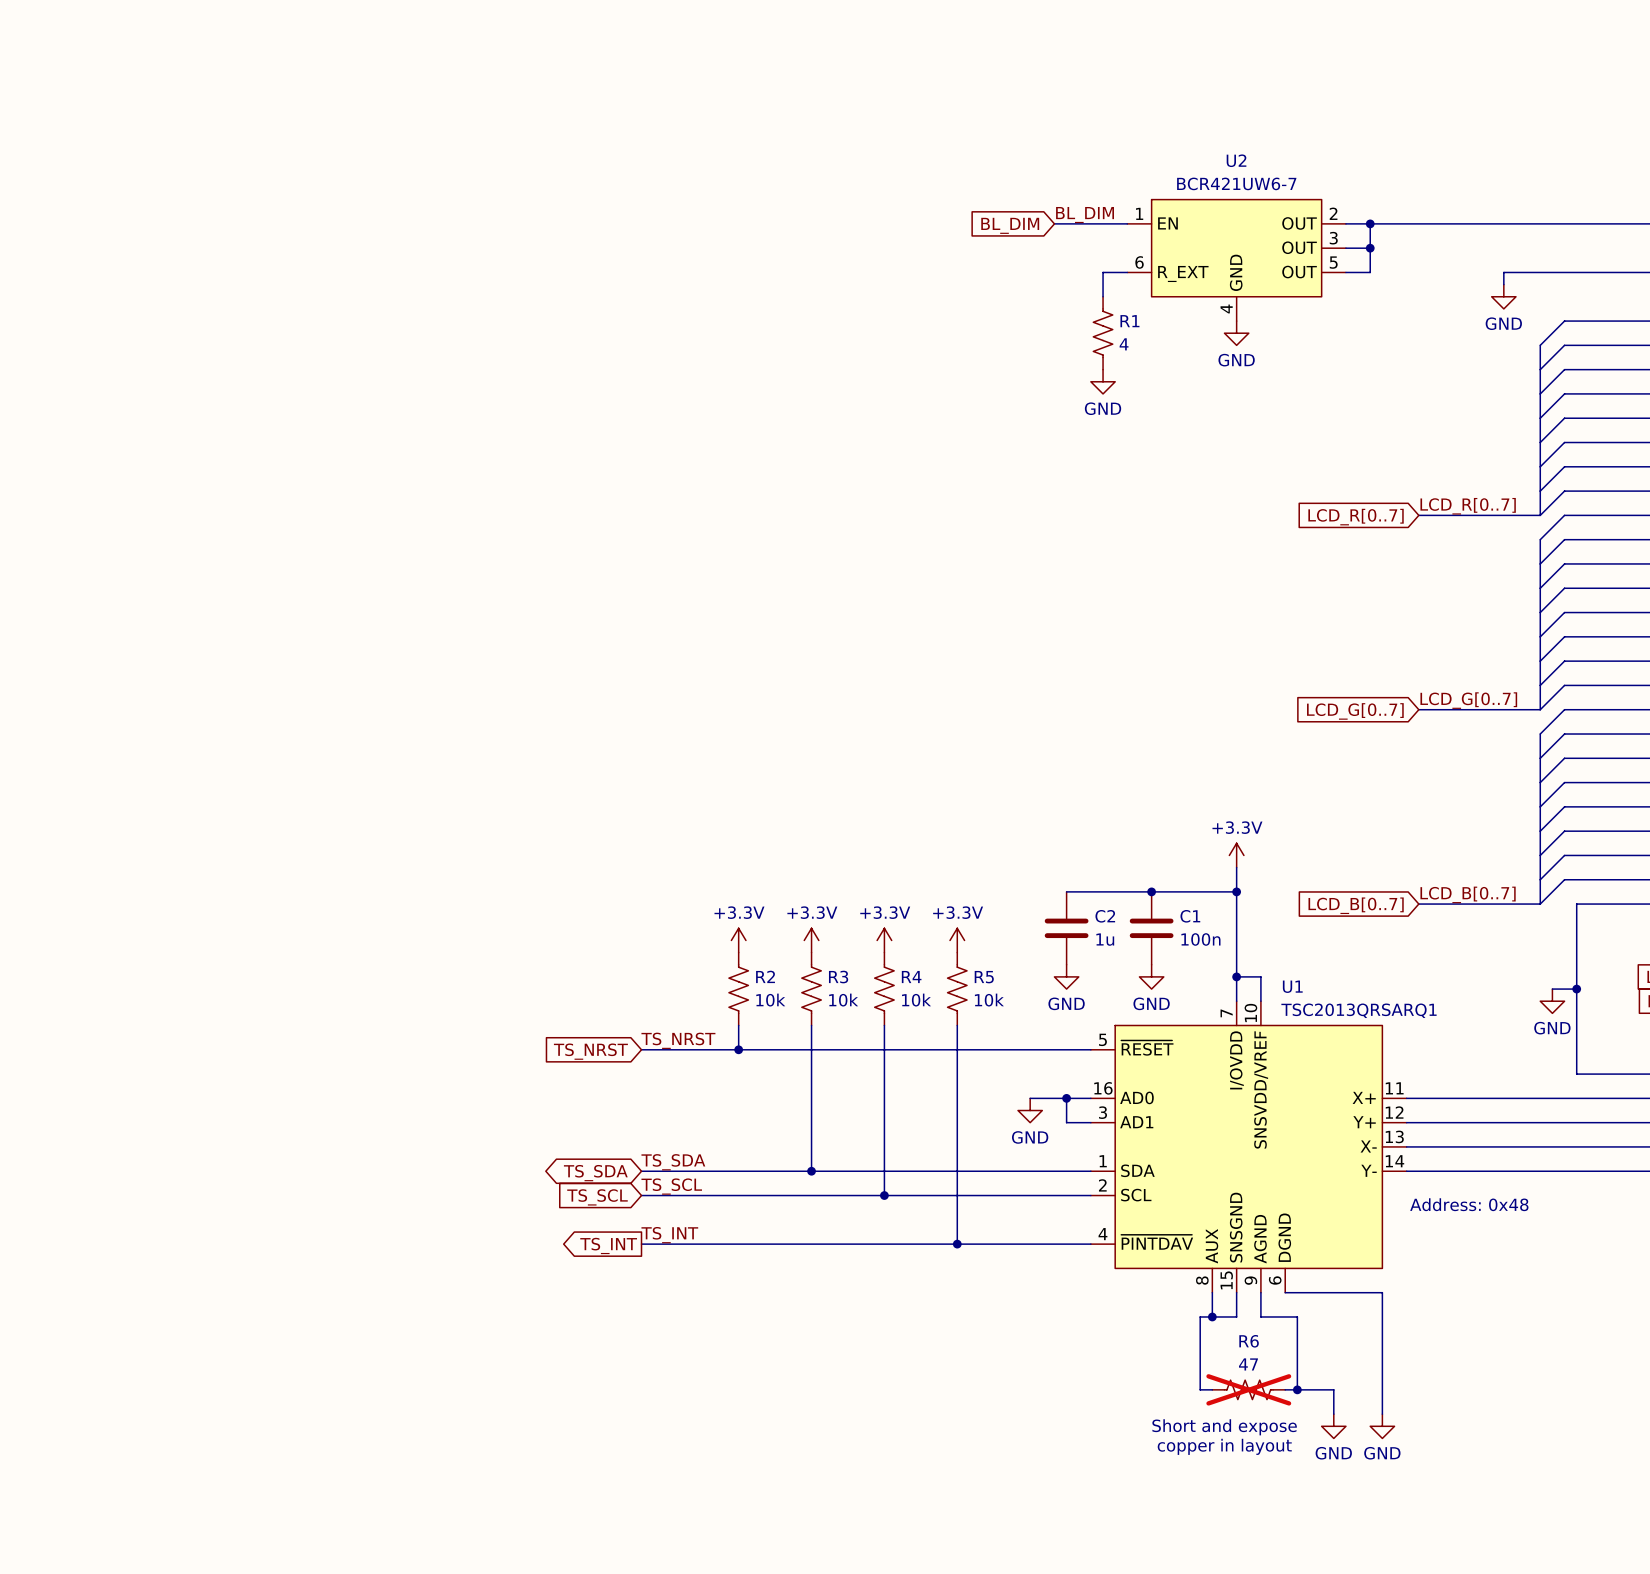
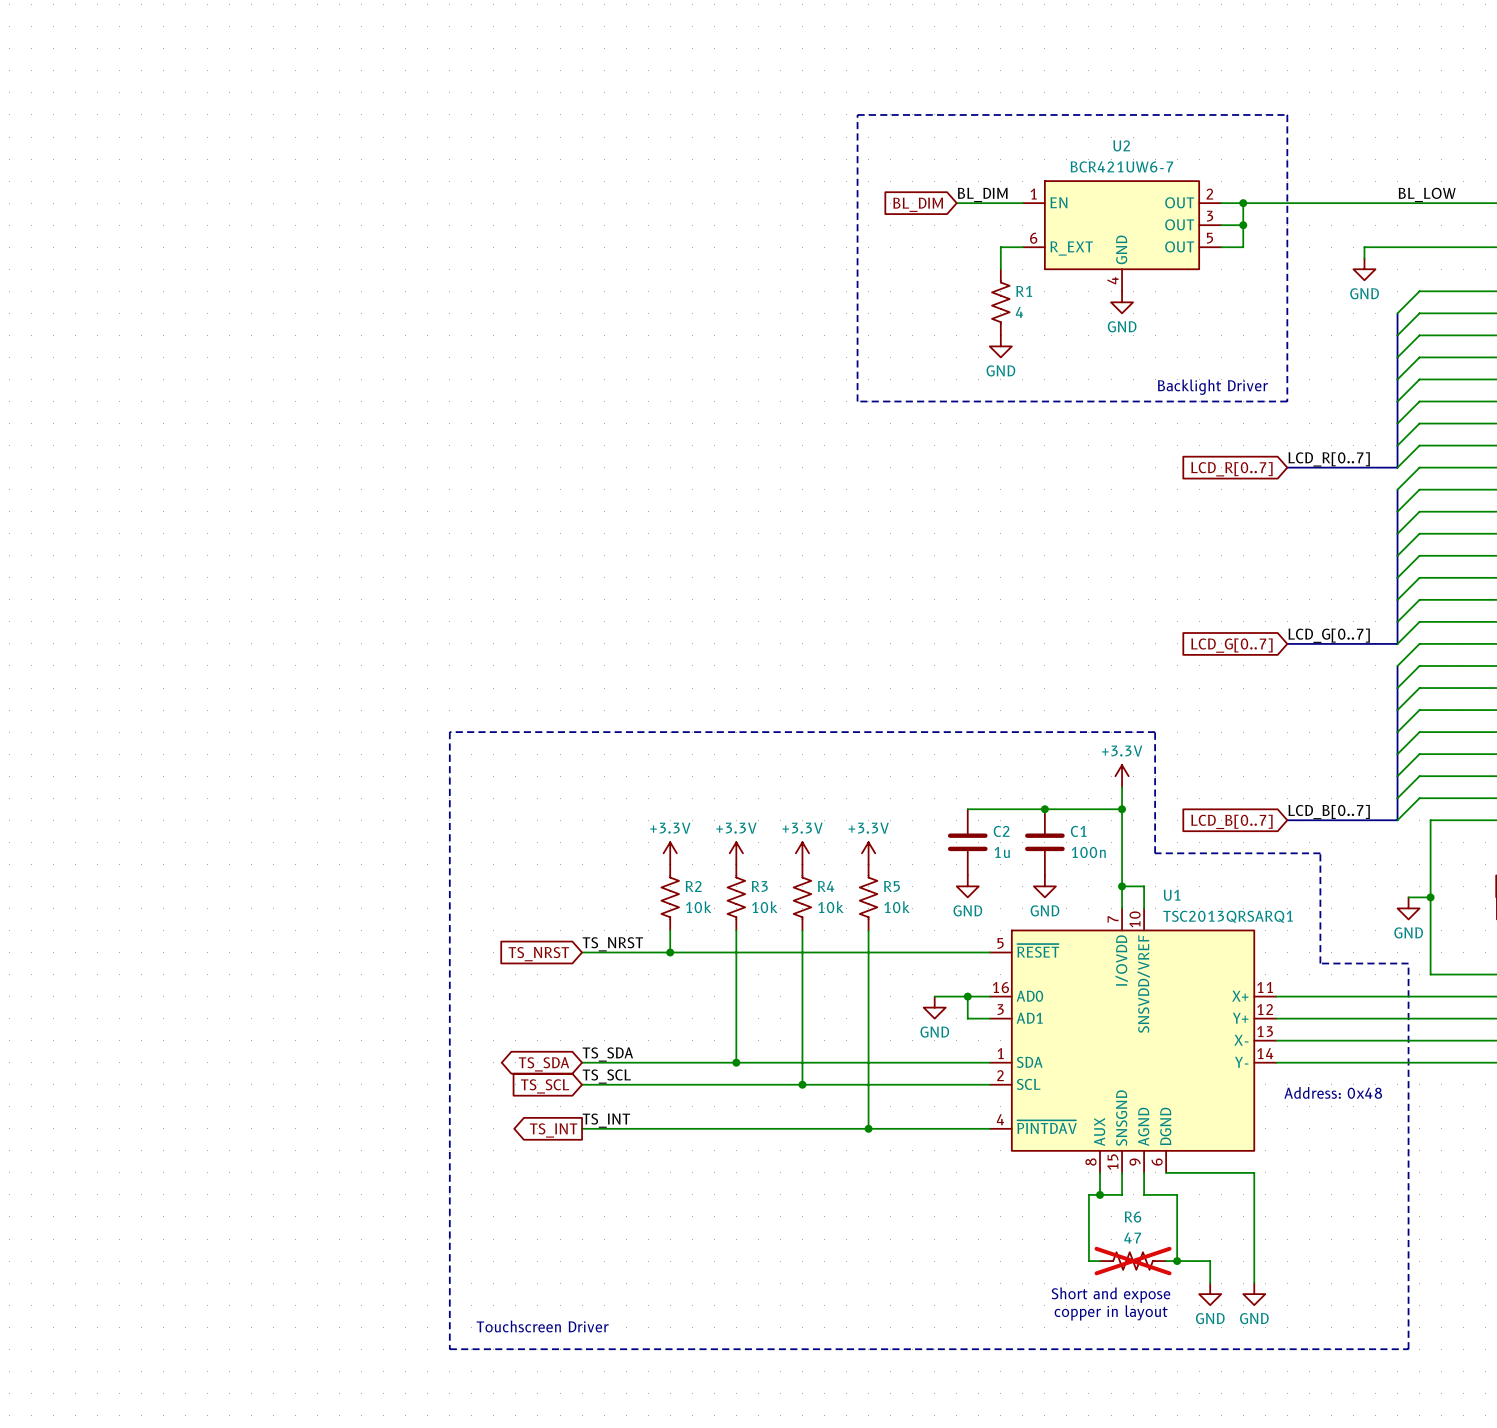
line: none -> (857, 114) (1287, 114) (1287, 401) (857, 401) (857, 114)
label: none -> BL_LOW (1427, 194)
text: none -> Backlight Driver (1212, 387)
line: none -> (449, 732) (449, 1349) (1408, 1349) (1408, 963) (1320, 963) (1320, 853) (1155, 853) (1155, 732) (449, 732)
text: none -> Touchscreen Driver (542, 1326)

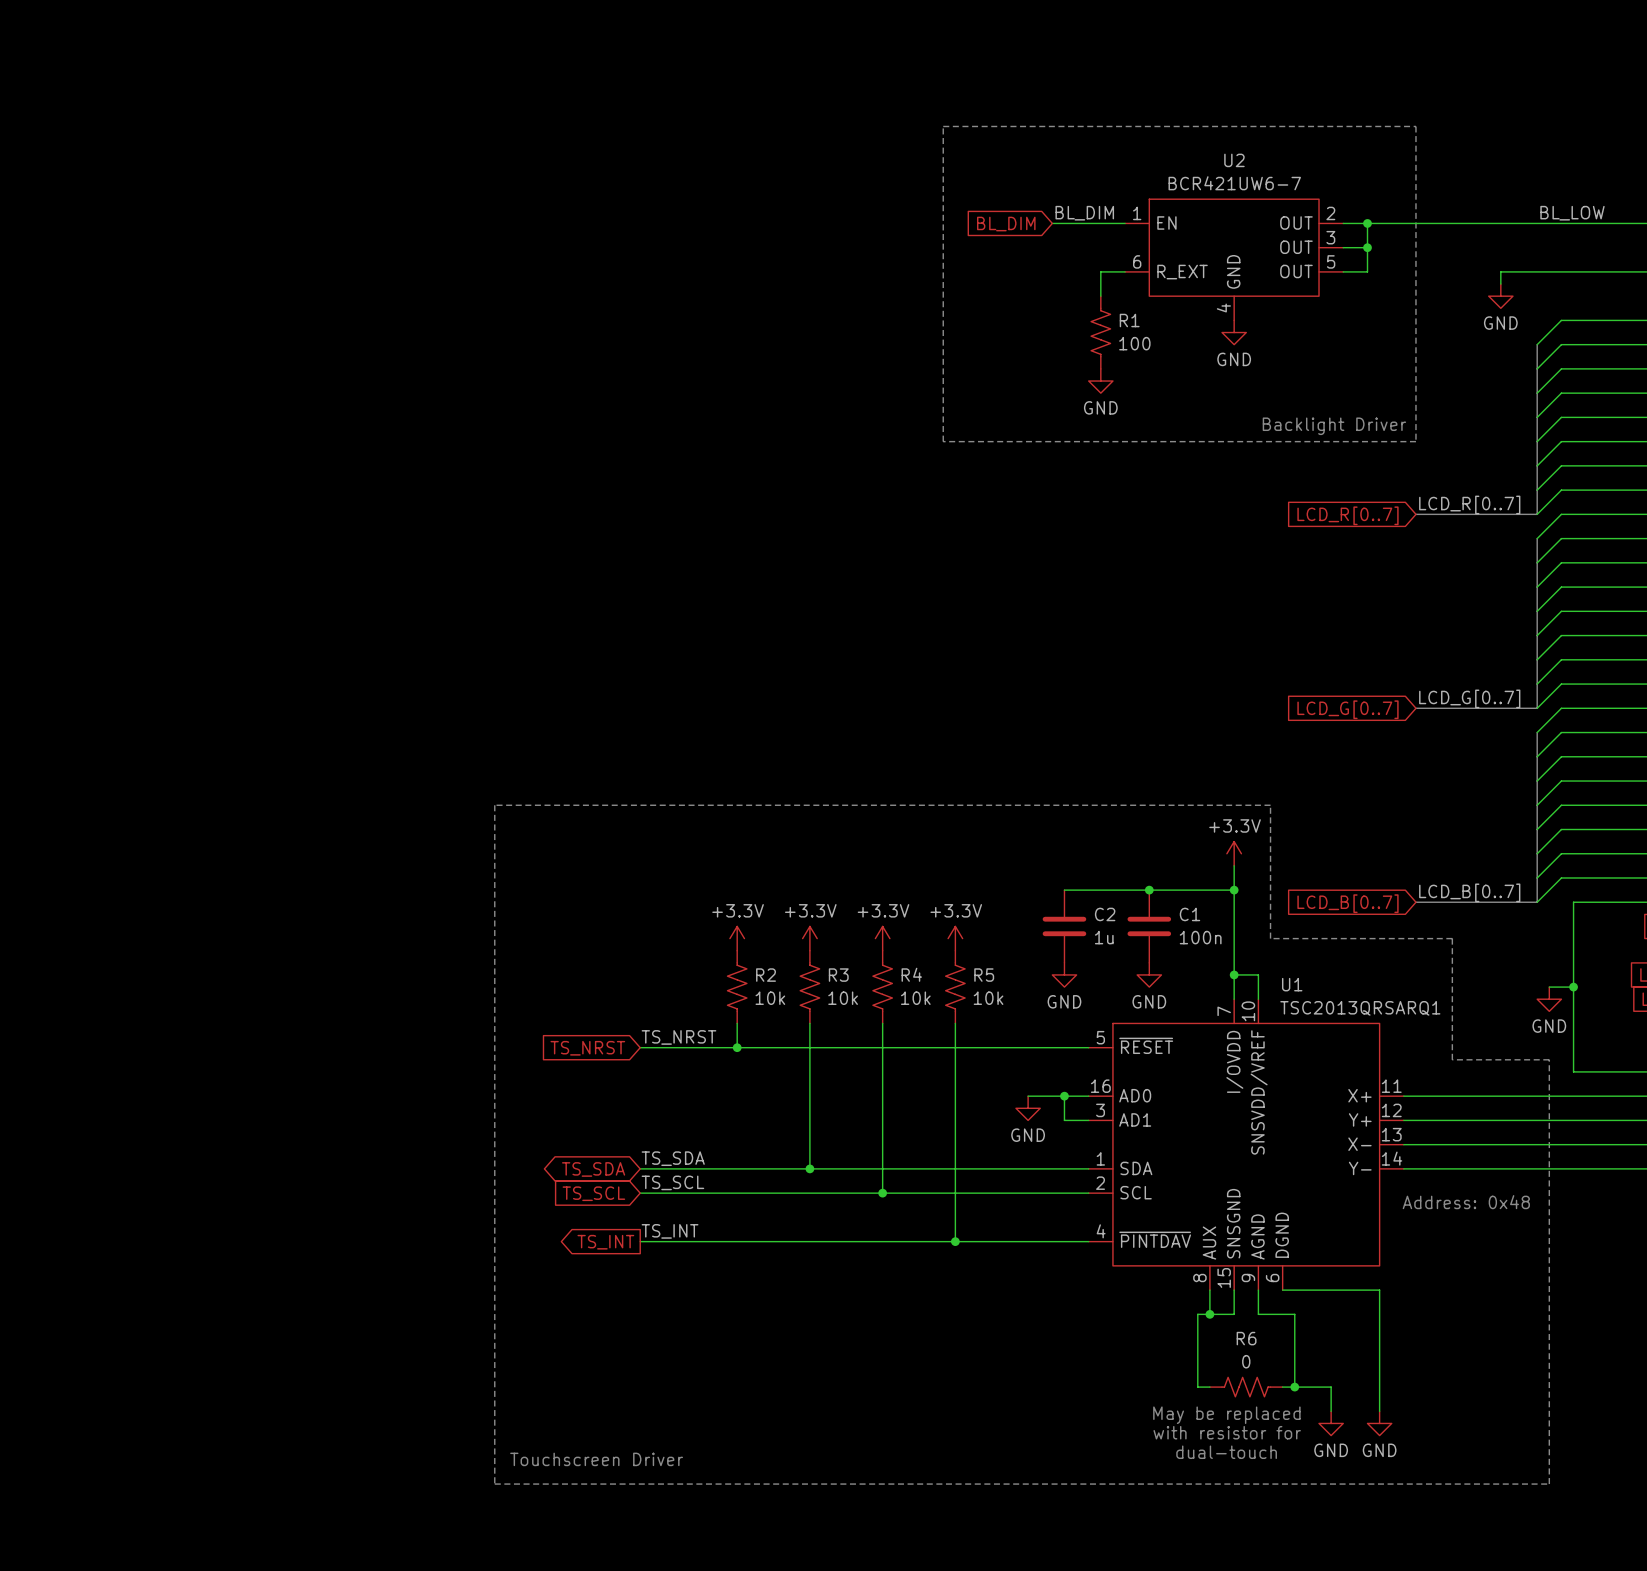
R1 value: 4 (1019, 312) -> 100 (1134, 343)
R6 value: 47 (1132, 1238) -> 0 (1246, 1361)
R6 do-not-place cross: (1133, 1261) -> none
text: none -> May be replaced (1226, 1415)
text: Short and expose (1110, 1295) -> none
text: none -> with resistor for (1227, 1432)
text: copper in layout (1111, 1312) -> none
text: none -> dual-touch (1226, 1452)

